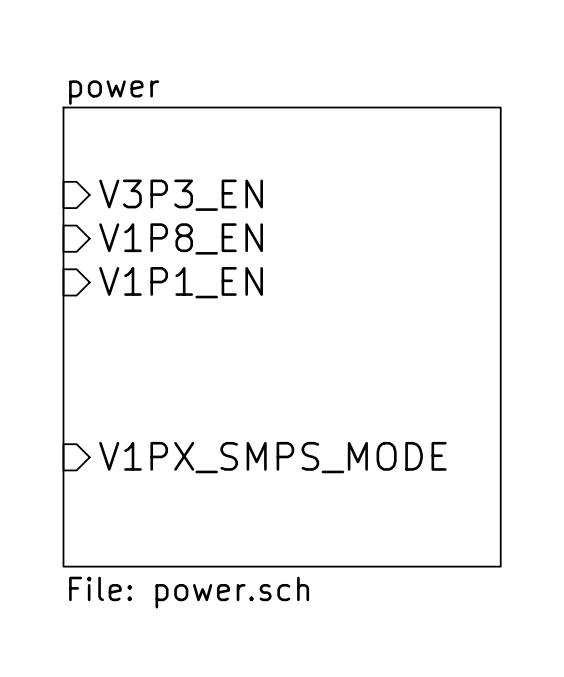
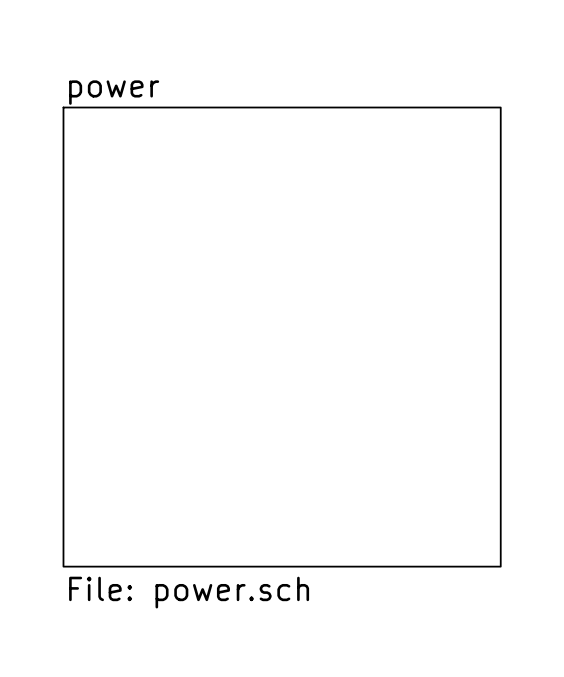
sheet pin: V3P3_EN (181, 195) -> none
sheet pin: V1P8_EN (181, 238) -> none
sheet pin: V1P1_EN (181, 282) -> none
sheet pin: V1PX_SMPS_MODE (272, 457) -> none

